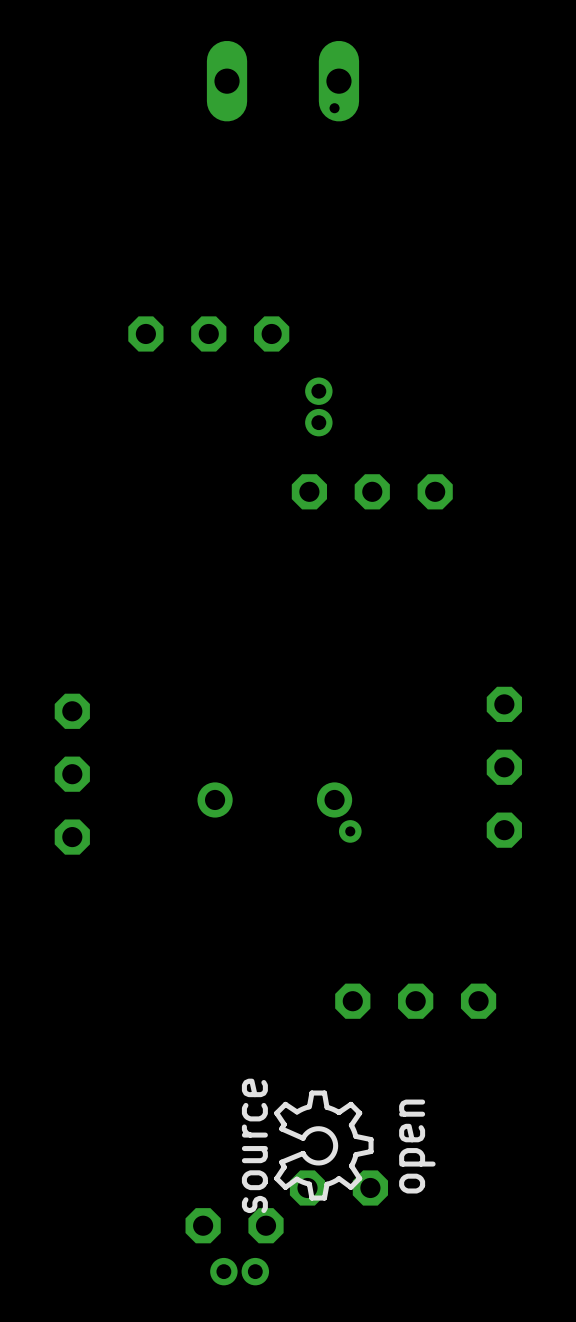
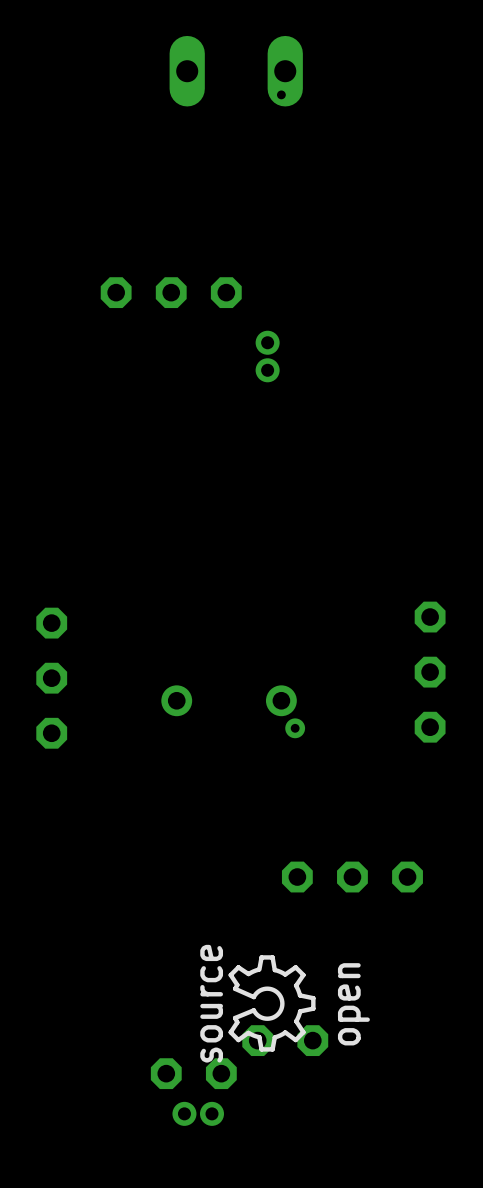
part: (372, 491) -> none

